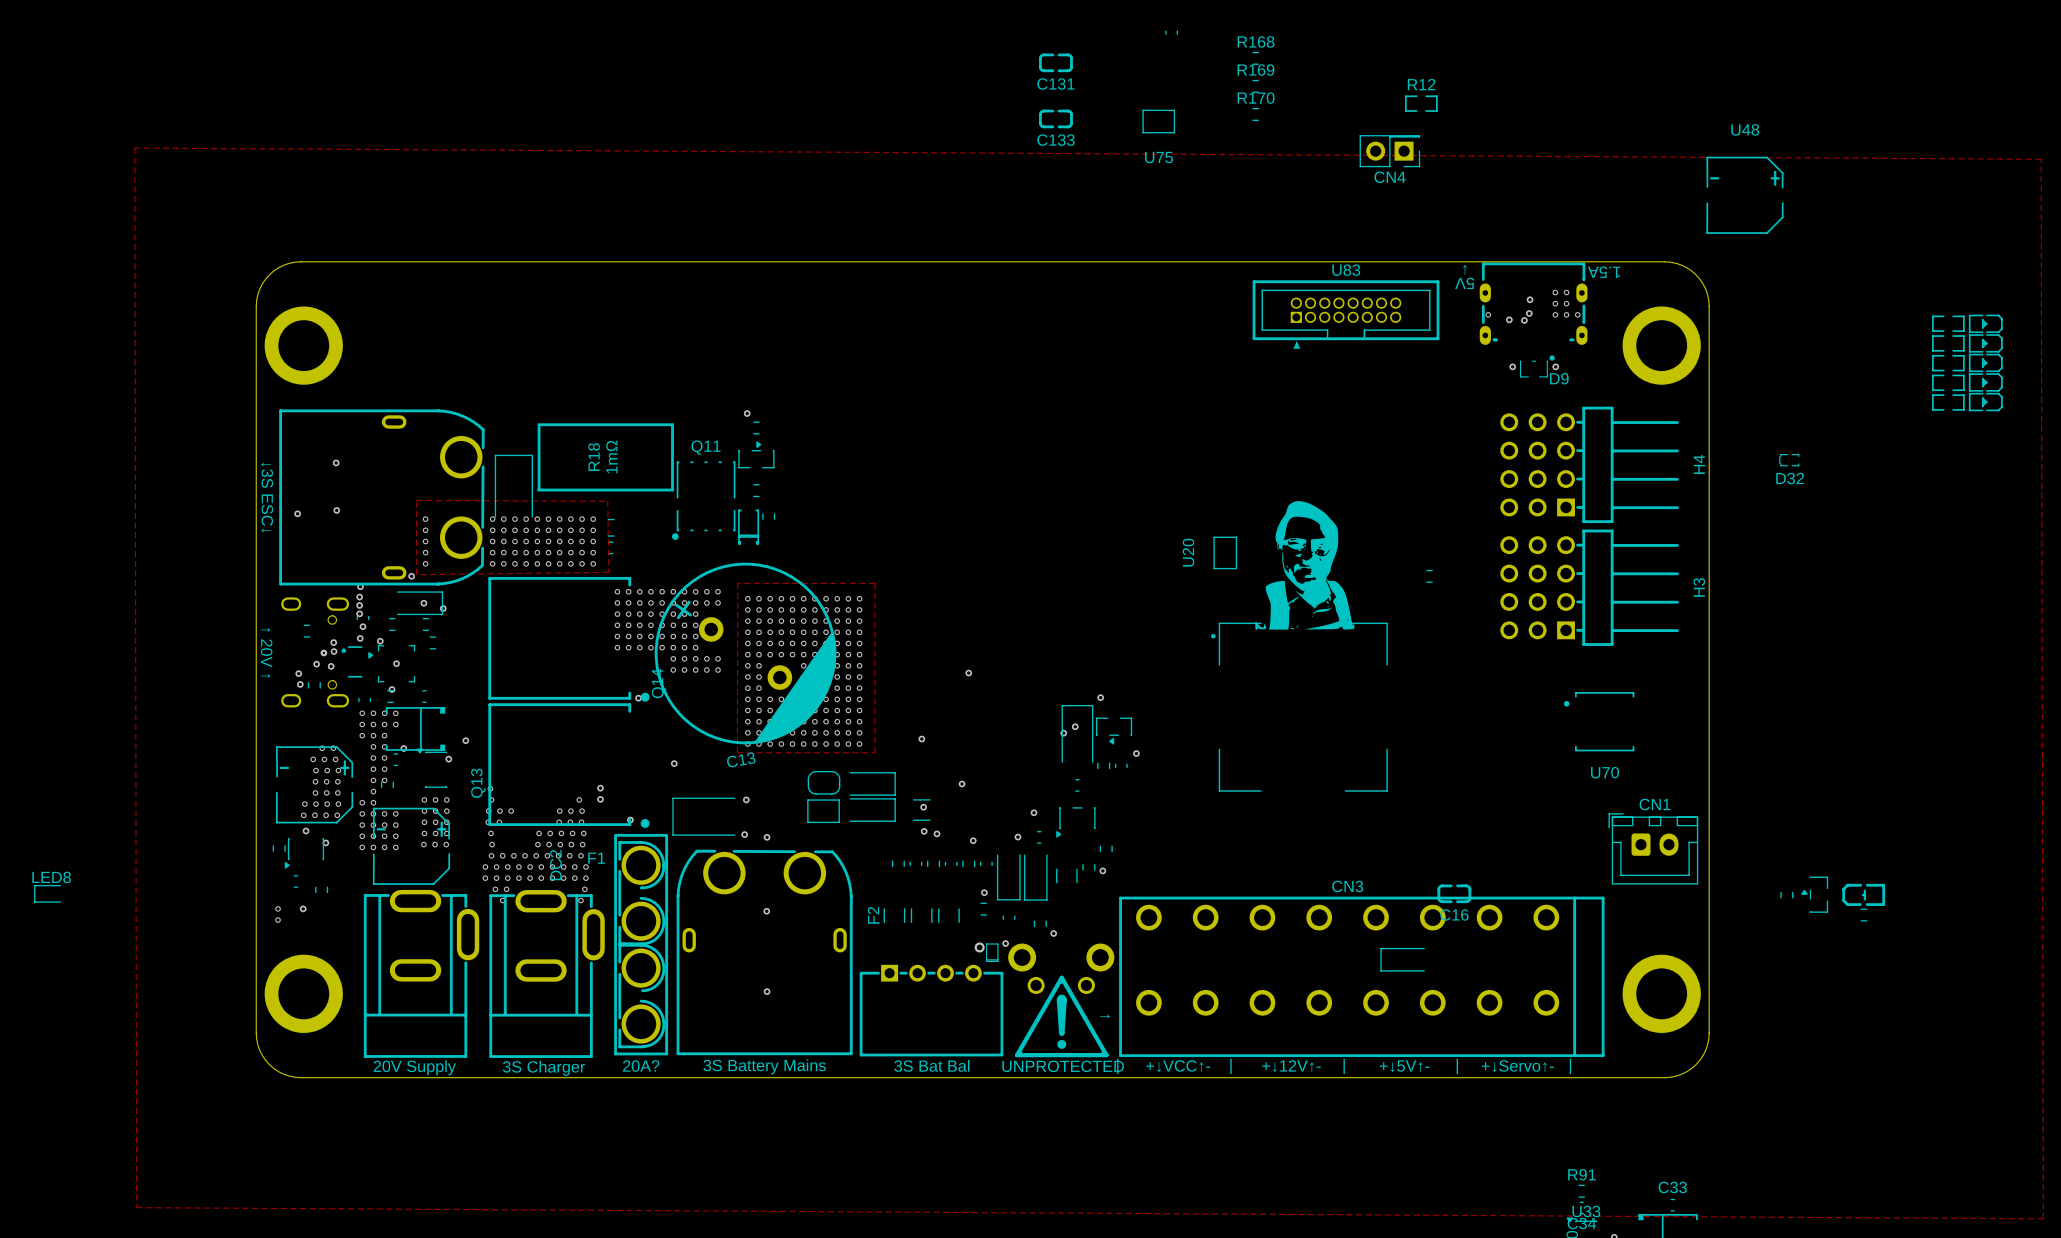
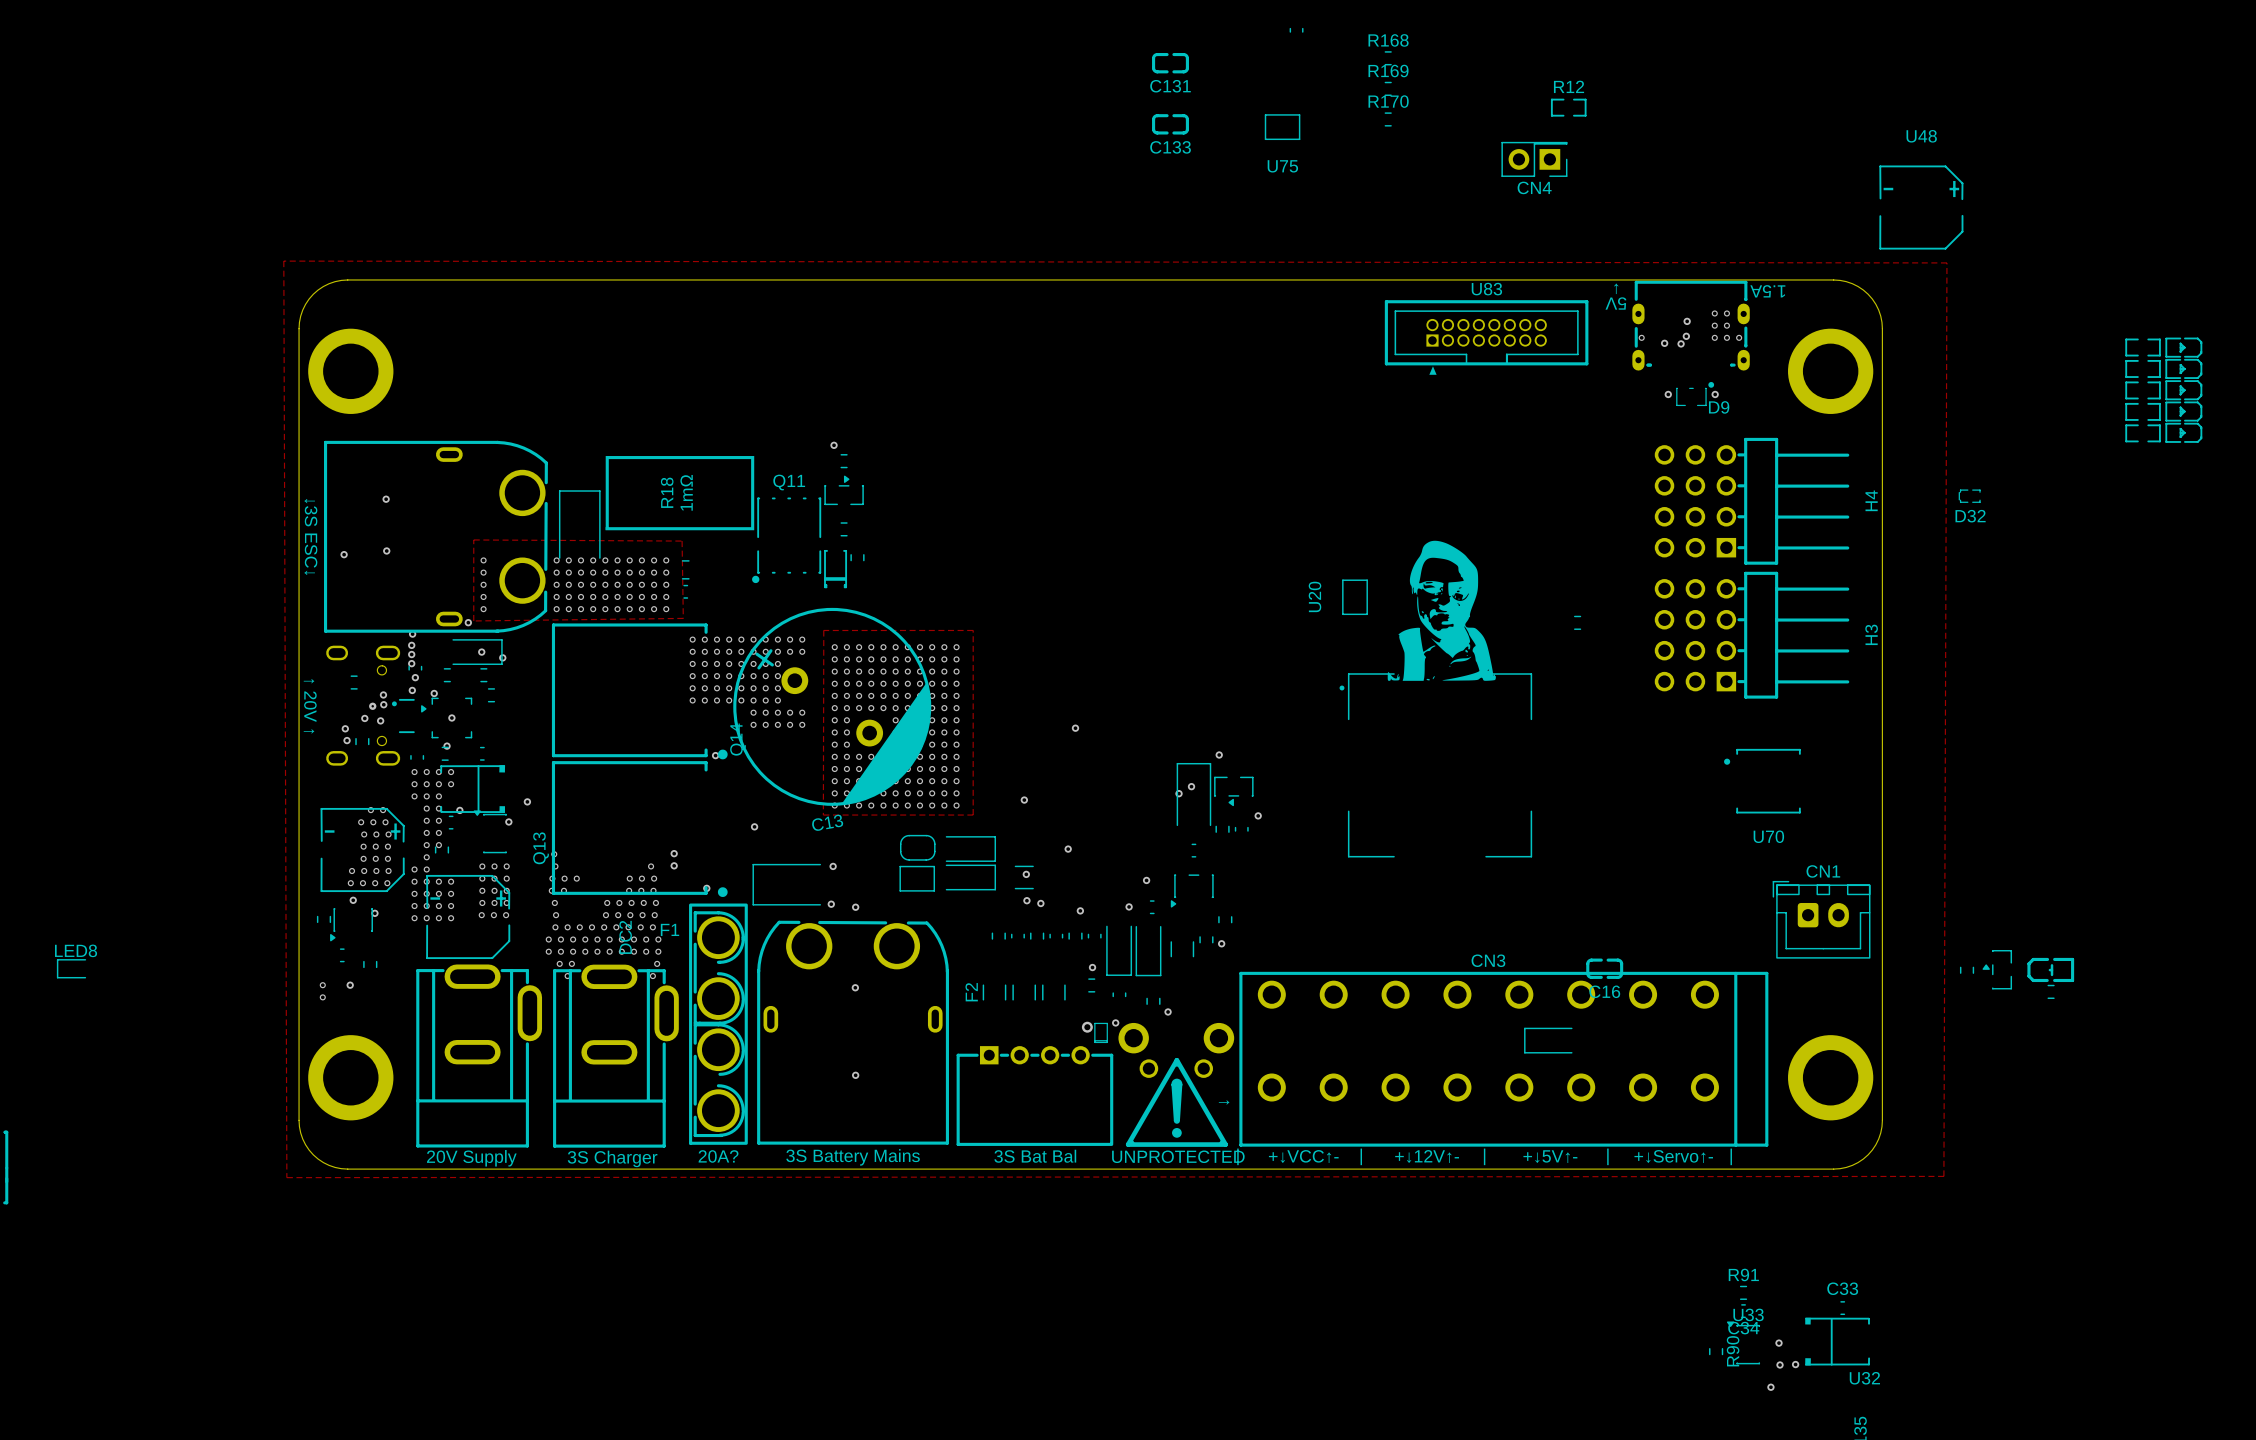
zone outline: (134, 148) (136, 1207) (2043, 1218) (2041, 159) (134, 148) -> (283, 261) (286, 1177) (1943, 1176) (1946, 262) (283, 261)

